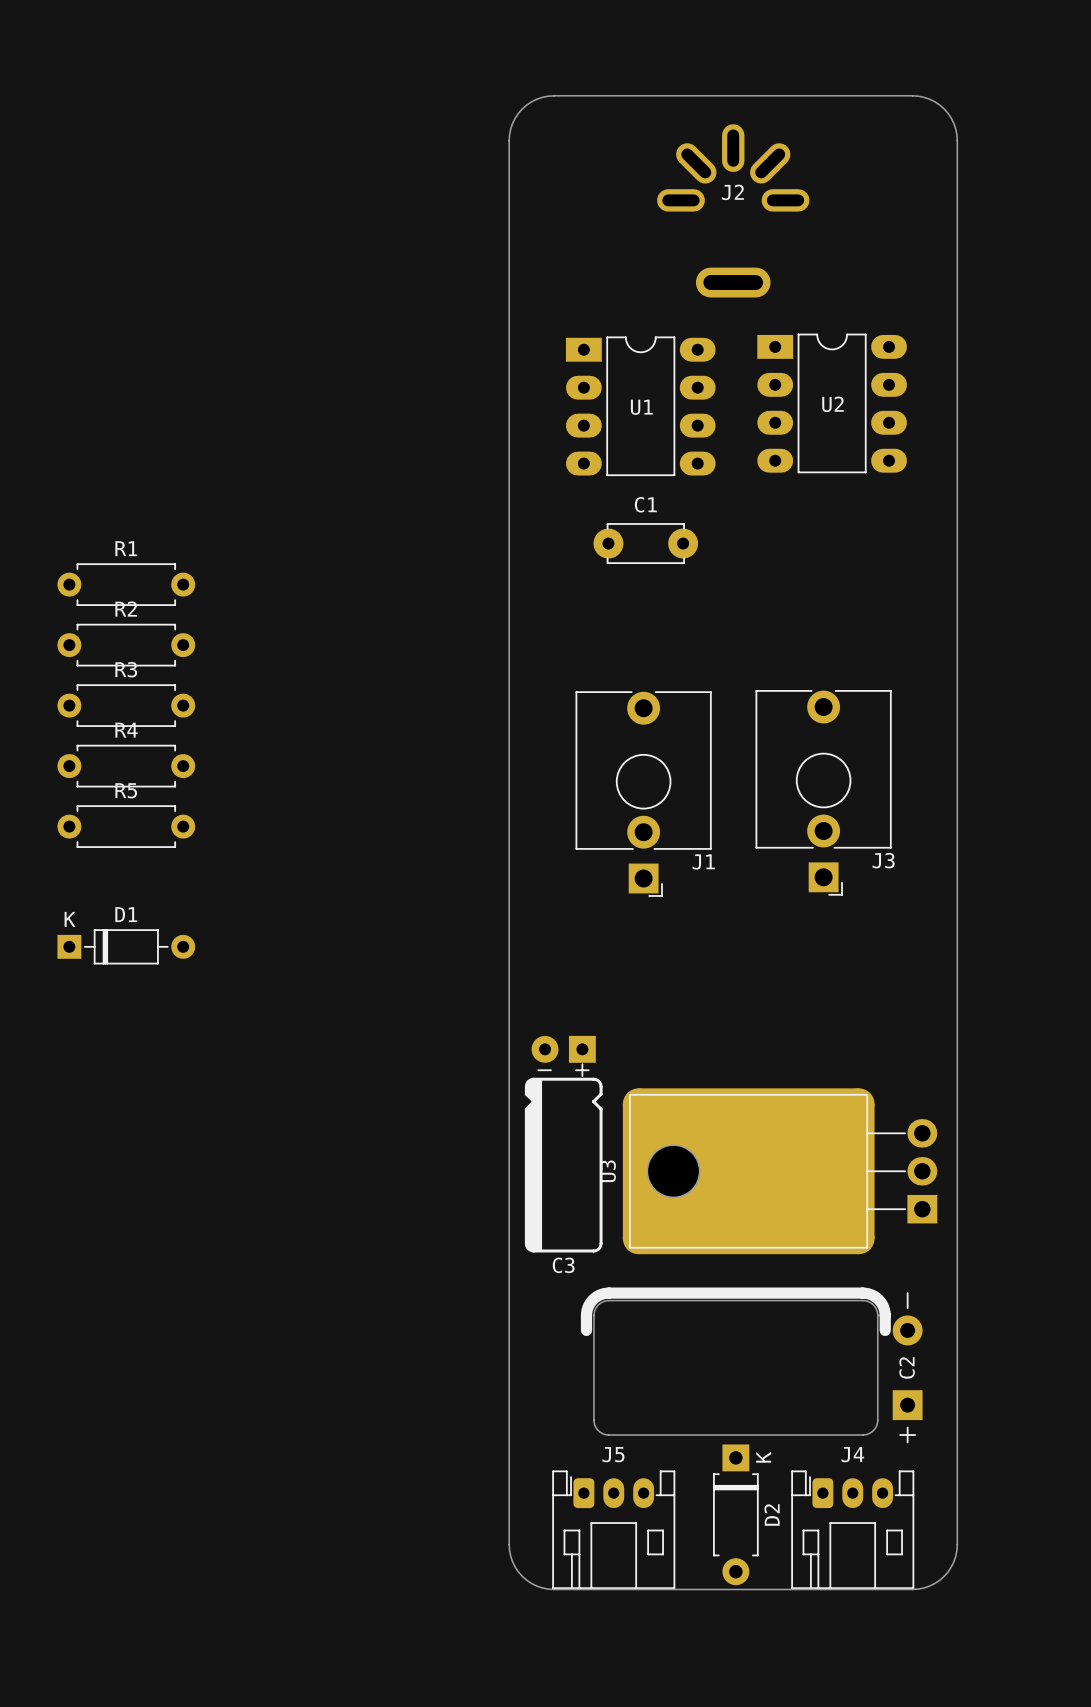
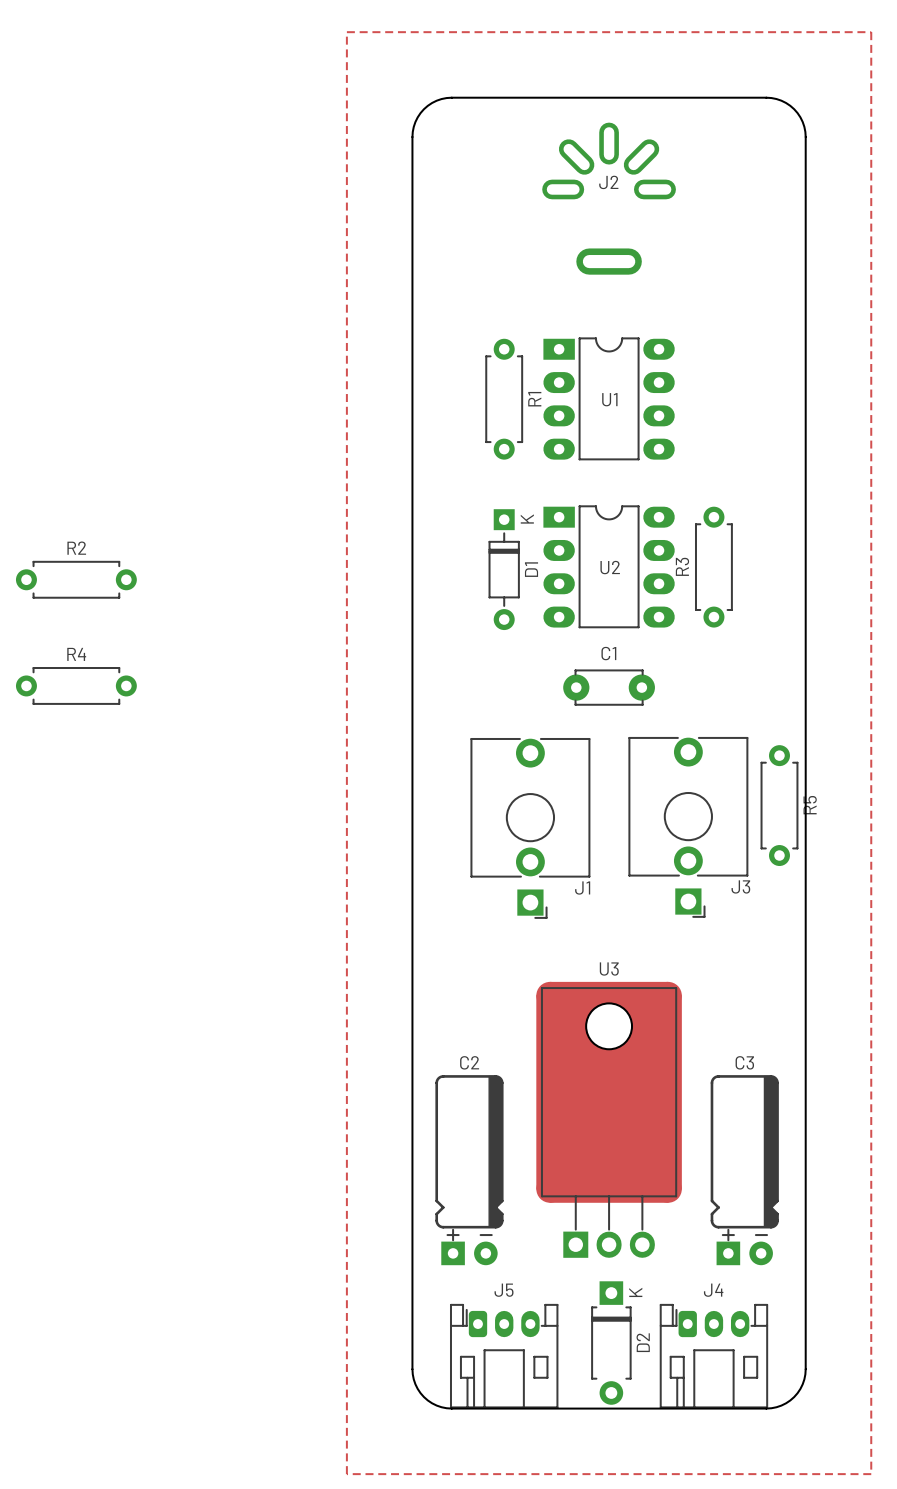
zone outline: none -> (346, 32) (871, 32) (871, 1474) (346, 1474) (346, 32)
U2 position: (832, 403) -> (609, 566)
U1 position: (640, 406) -> (609, 398)
C1 position: (645, 543) -> (609, 687)
R1 rotation: 0° (126, 584) -> 90° clockwise (504, 399)
R1 position: (126, 584) -> (504, 399)
R3 name position: R3 (126, 669) -> R3 (682, 566)
R3 rotation: 0° (126, 705) -> 90° clockwise (713, 567)
R3 position: (126, 705) -> (713, 567)
J3 position: (823, 792) -> (688, 827)
J1 position: (643, 794) -> (530, 828)
R5 rotation: 0° (126, 826) -> 90° clockwise (779, 805)
R5 position: (126, 826) -> (779, 805)
D1 rotation: 0° (126, 946) -> 90° clockwise (504, 569)
D1 position: (126, 946) -> (504, 569)
C3 rotation: 0° (563, 1144) -> 180° (744, 1170)
C3 position: (563, 1144) -> (744, 1170)
U3 rotation: 0° (780, 1171) -> 90° clockwise (609, 1119)
C2 footprint: [580, 1287, 923, 1444] -> [435, 1075, 504, 1266]
C2 name position: C2 (907, 1367) -> C2 (469, 1062)

